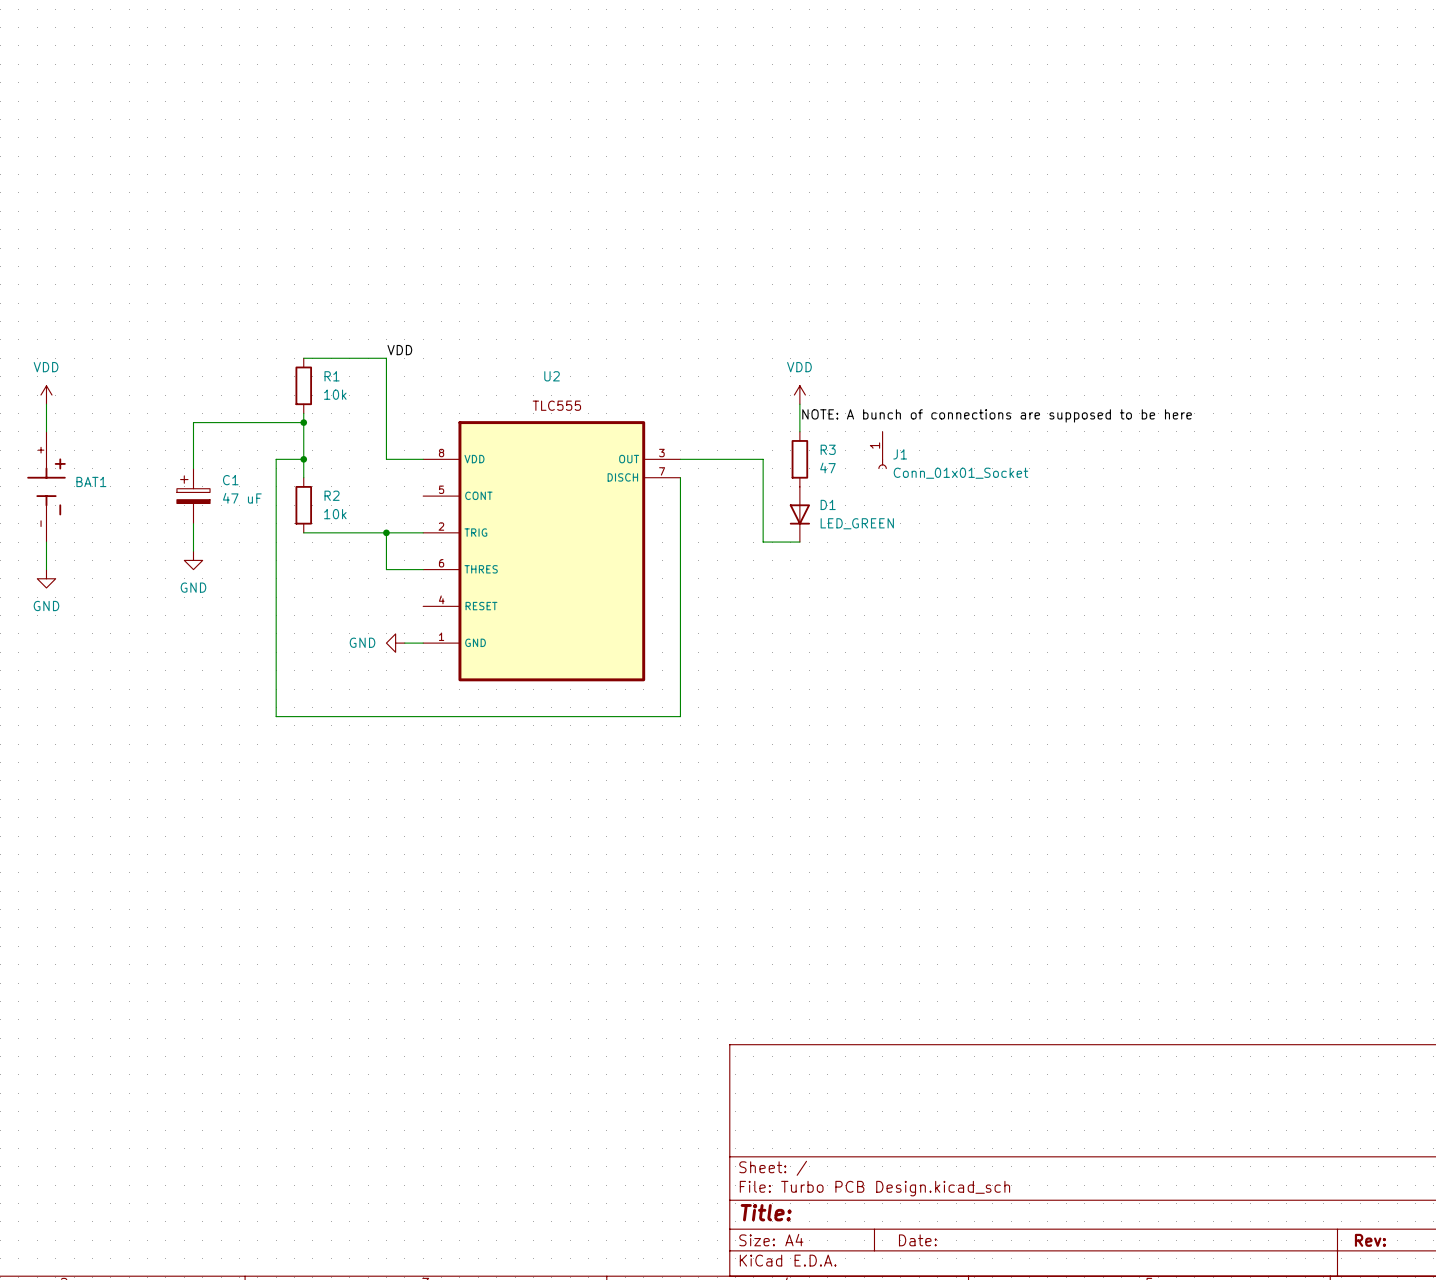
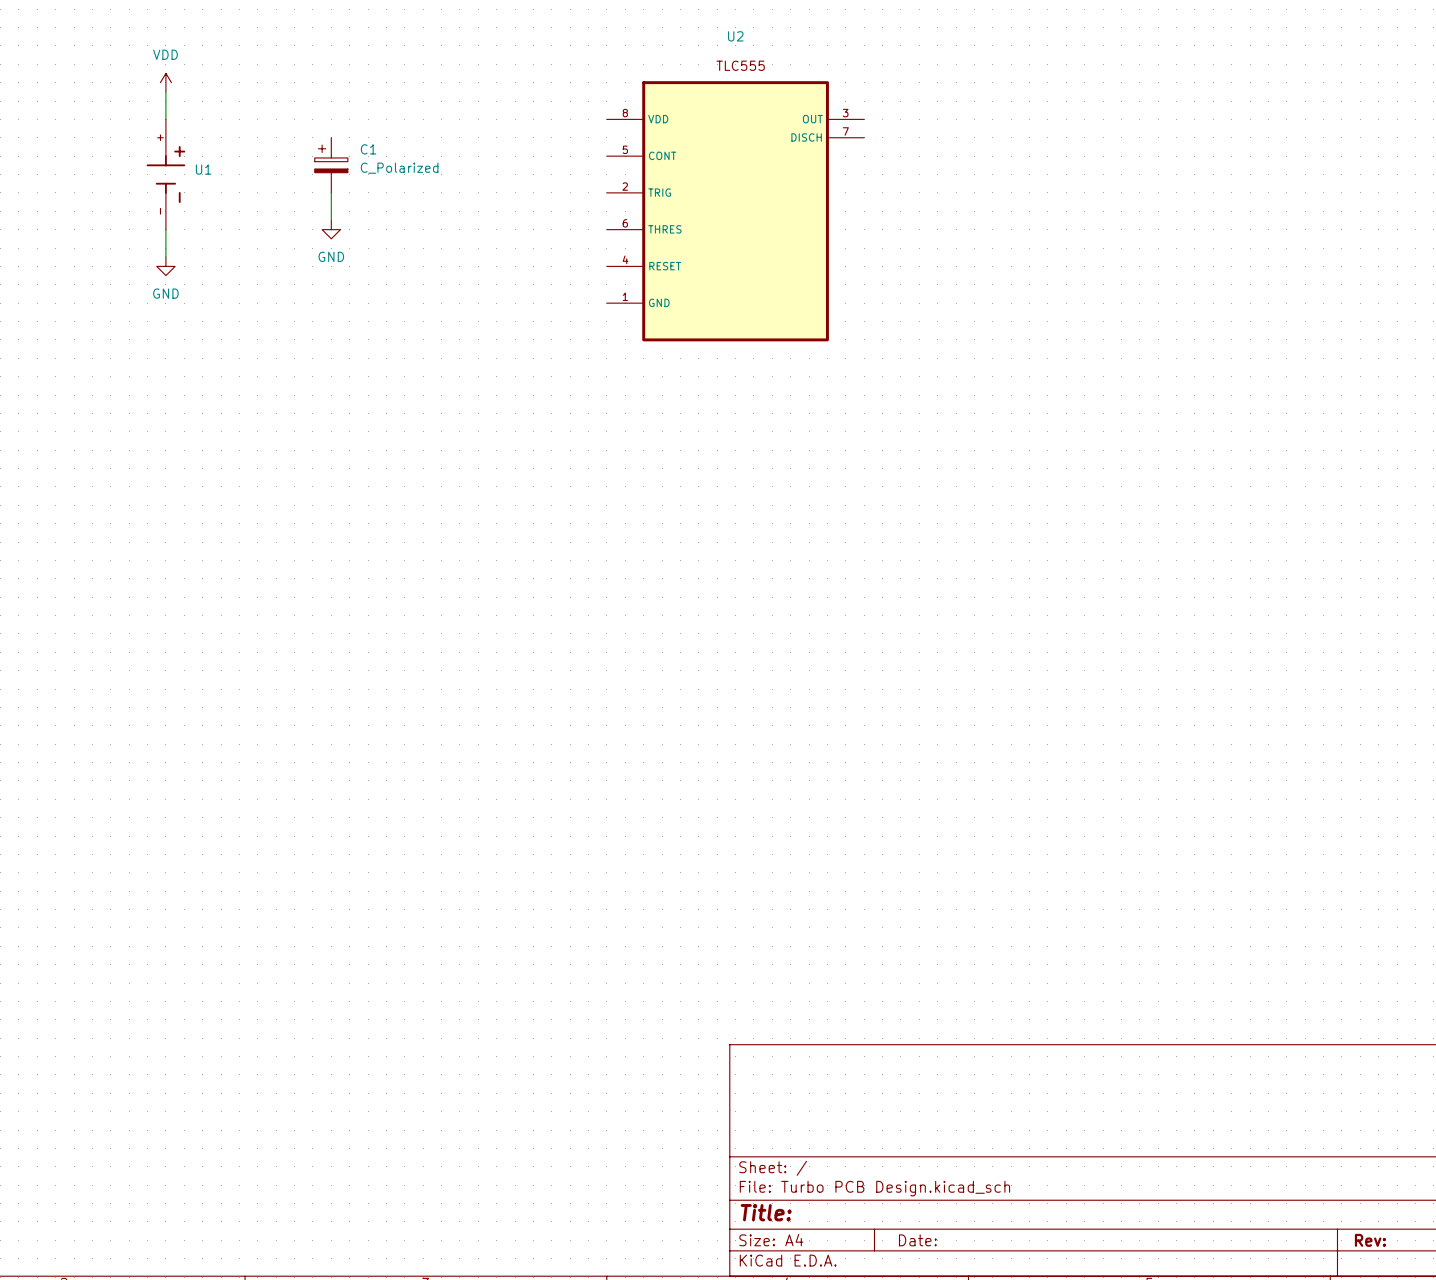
power symbol: none -> VDD (165, 82)
wire: none -> (165, 91) (165, 119)
U1: none -> (165, 174)
wire: none -> (331, 192) (331, 220)
wire: none -> (165, 229) (165, 257)
power symbol: none -> GND (331, 229)
power symbol: none -> GND (165, 266)
label: VDD (399, 350) -> none
wire: (303, 358) (386, 358) (386, 459) (423, 459) -> none
R1: 10k (303, 385) -> none
power symbol: VDD (46, 395) -> none
power symbol: VDD (799, 395) -> none
wire: (46, 404) (46, 431) -> none
wire: (799, 404) (799, 431) -> none
wire: (303, 413) (303, 477) -> none
label: NOTE: A bunch of connections are supposed to be here (997, 415) -> none
wire: (303, 422) (193, 422) (193, 468) -> none
junction: (303, 422) -> none
J1: Conn_01x01_Socket (882, 450) -> none
wire: (303, 459) (276, 459) (276, 716) (680, 716) (680, 477) -> none
junction: (303, 459) -> none
wire: (680, 459) (763, 459) (763, 542) (799, 542) -> none
R3: 47 (799, 459) -> none
BAT1: (46, 486) -> none
C1 position: (193, 496) -> (331, 165)
C1 value: 47 uF (242, 498) -> C_Polarized (399, 168)
R2: 10k (303, 505) -> none
D1: LED_GREEN (799, 514) -> none
wire: (193, 523) (193, 551) -> none
wire: (303, 532) (423, 532) -> none
wire: (386, 532) (386, 569) (423, 569) -> none
junction: (386, 532) -> none
wire: (46, 542) (46, 569) -> none
U2 position: (551, 551) -> (735, 211)
power symbol: GND (193, 560) -> none
power symbol: GND (46, 578) -> none
power symbol: GND (395, 643) -> none
wire: (404, 643) (423, 643) -> none

